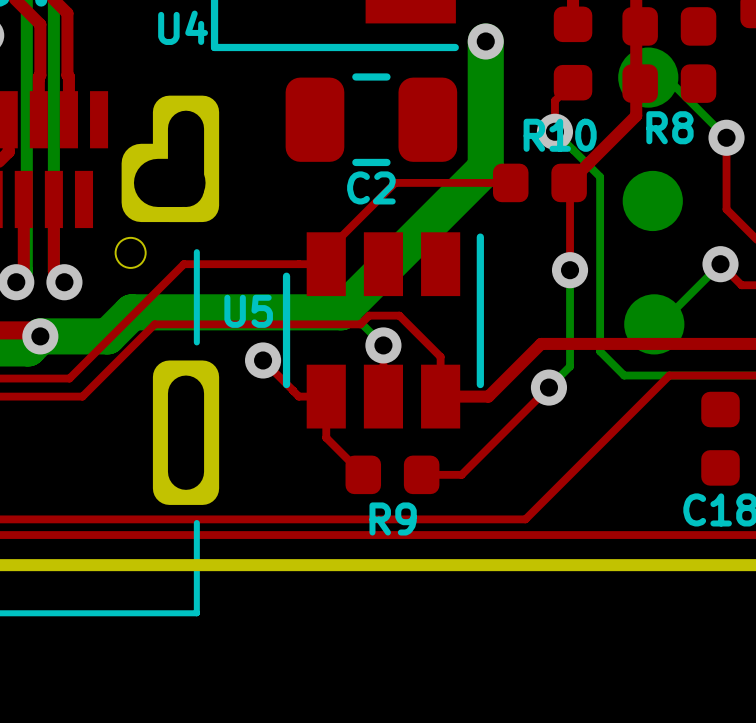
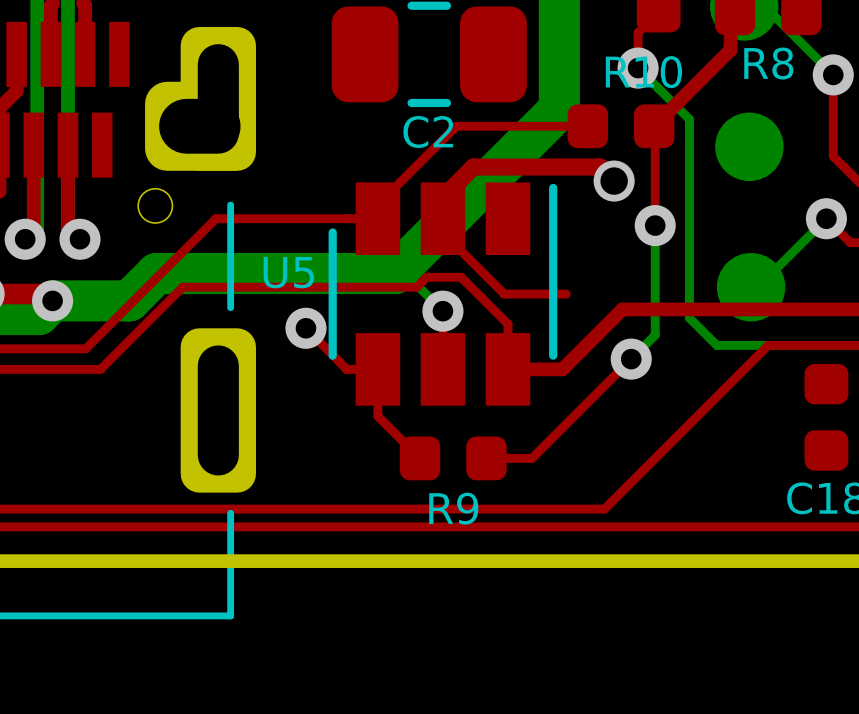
top track: none -> (614, 181) (600, 167) (473, 167) (442, 197) (442, 232) (504, 294) (566, 294)
via: none -> (614, 181)

